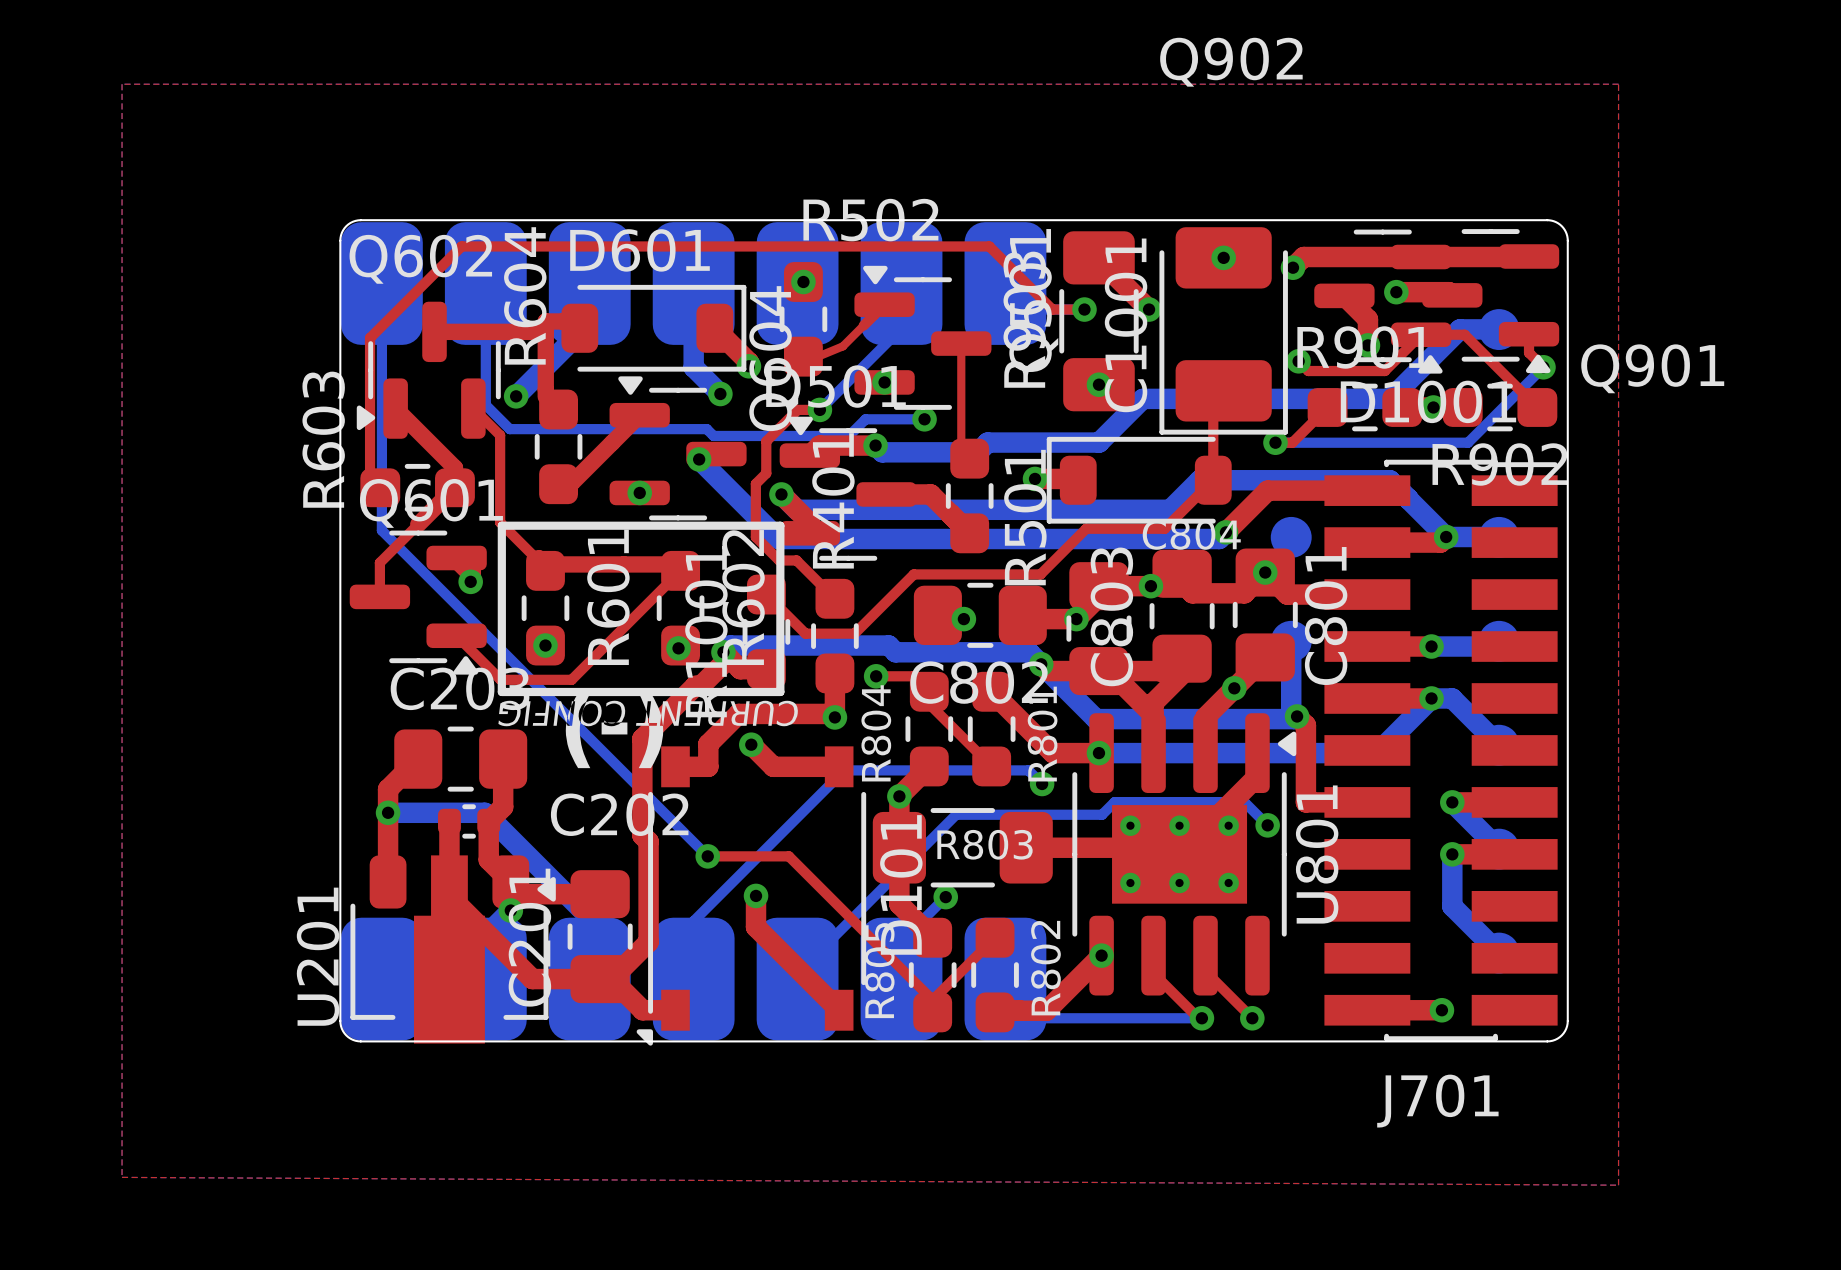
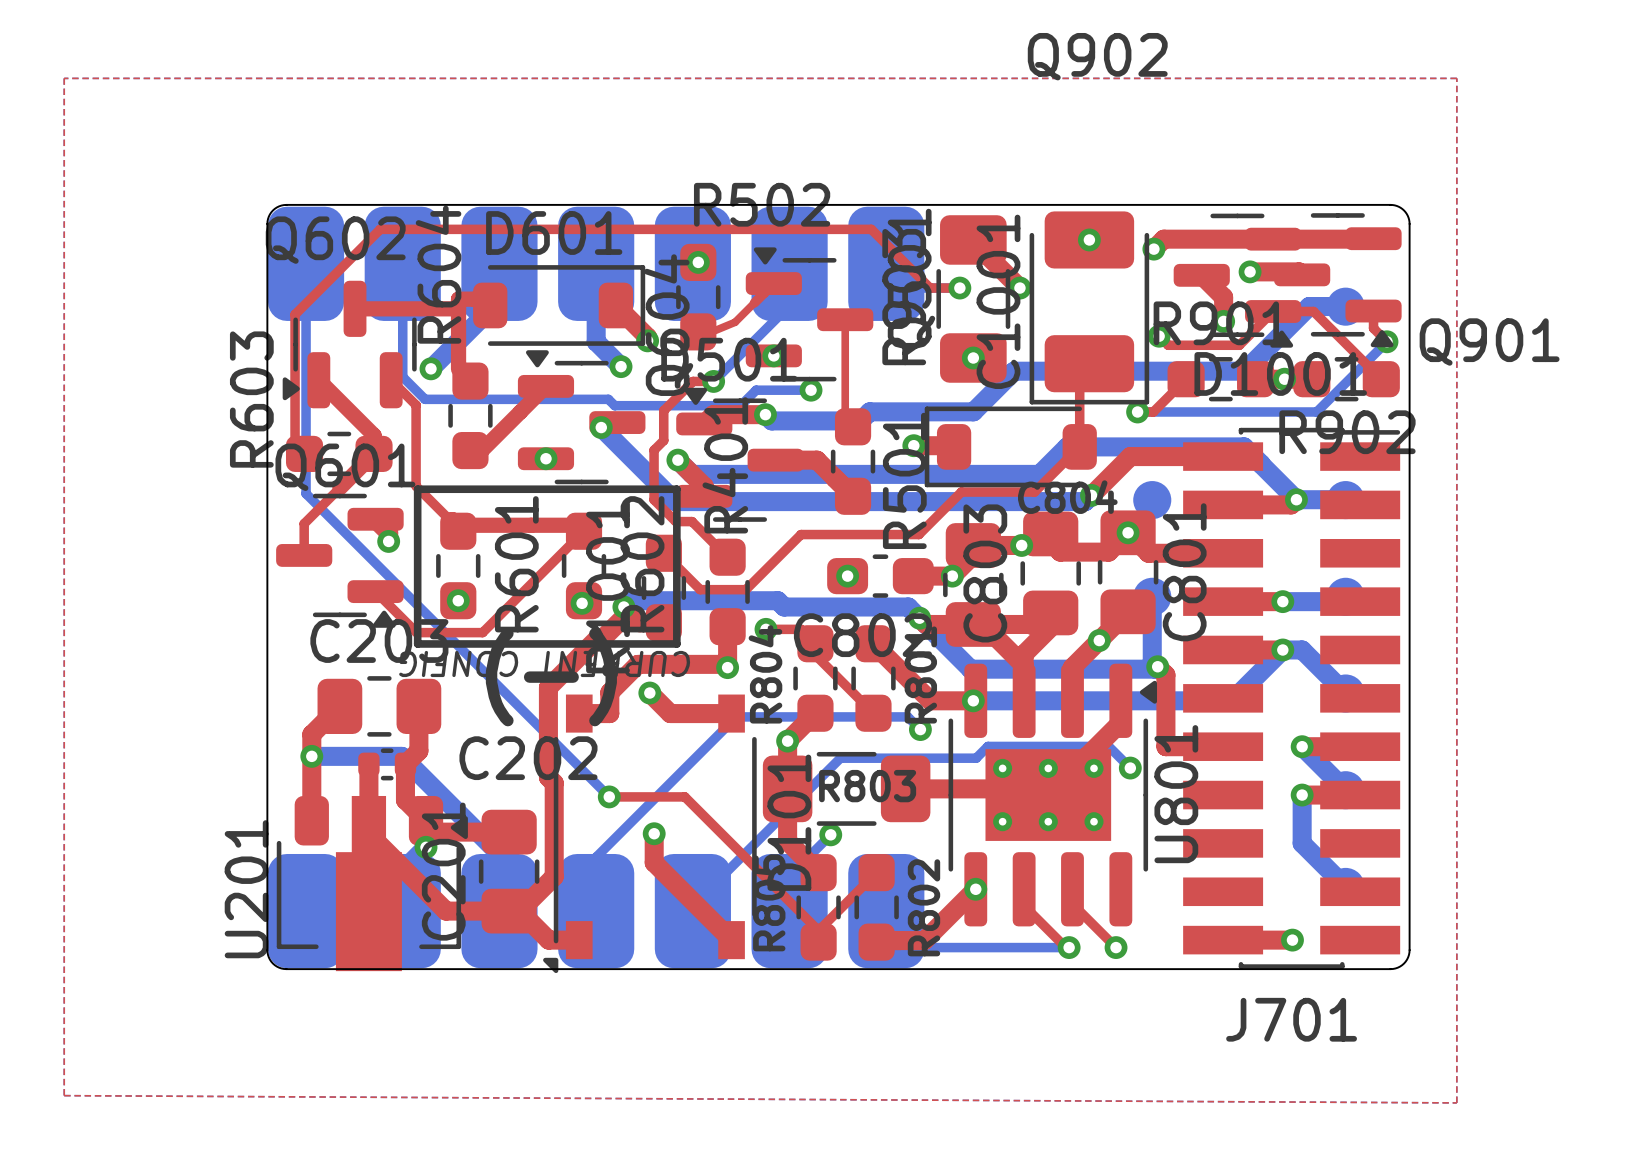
C802 footprint: [913, 582, 1047, 648] -> [827, 554, 934, 598]

